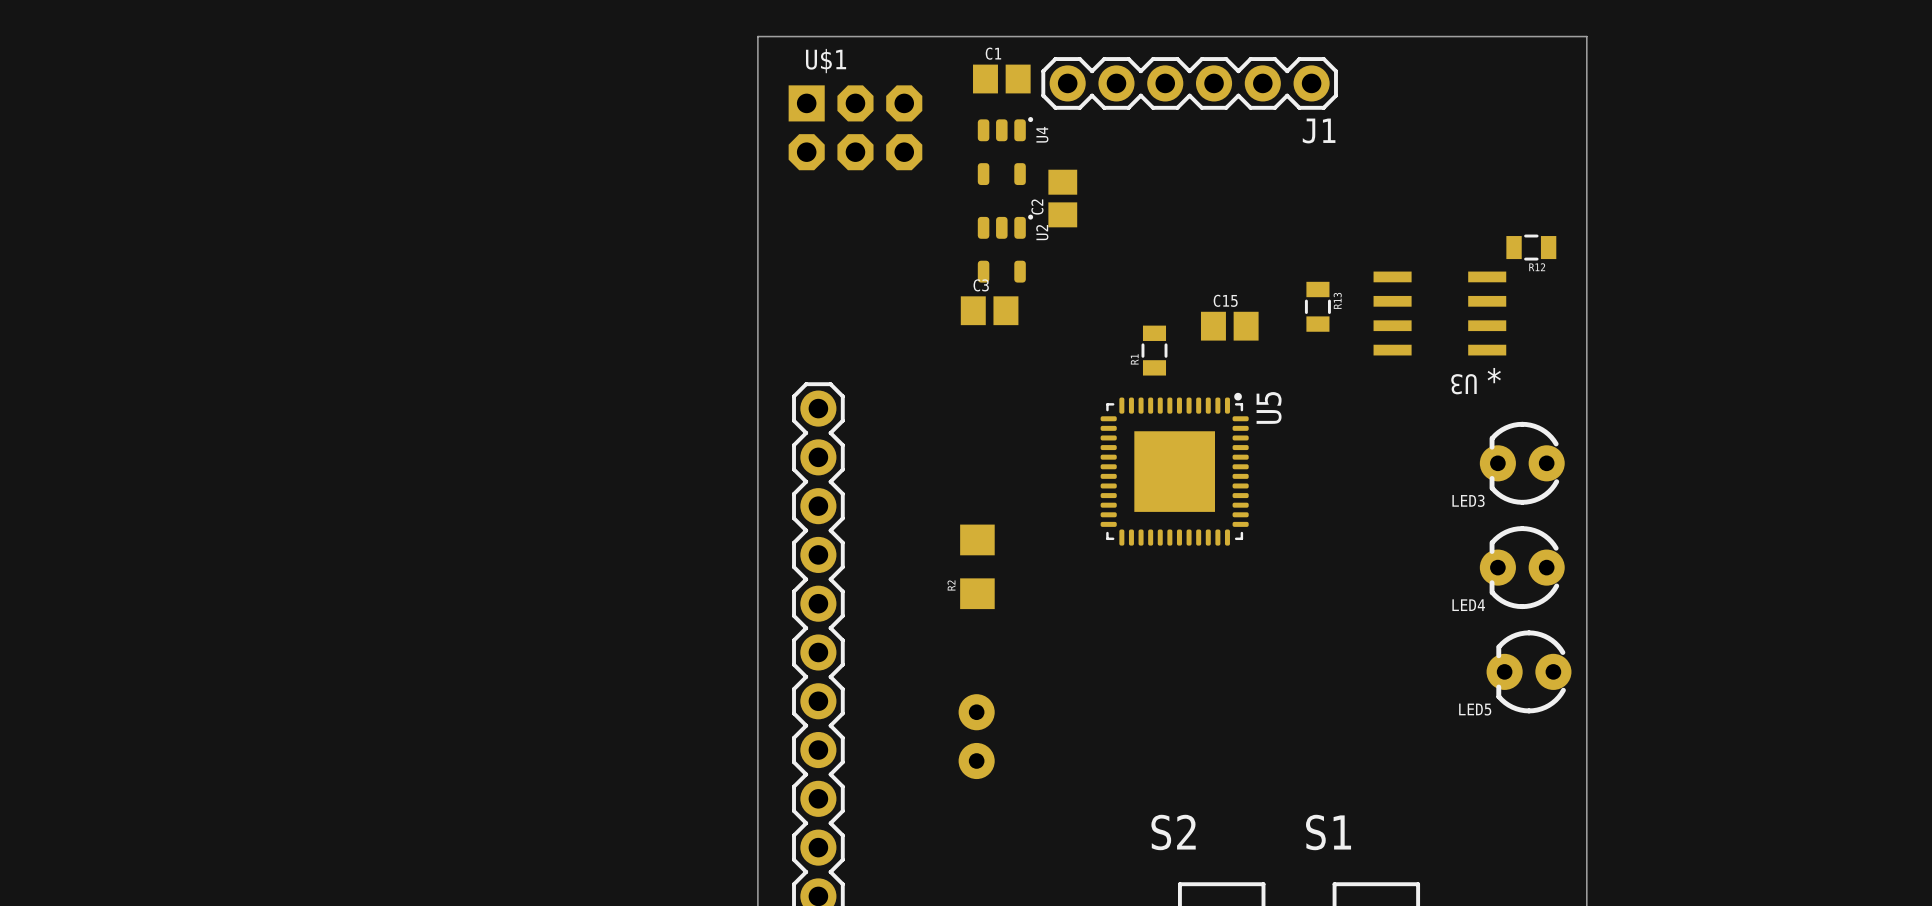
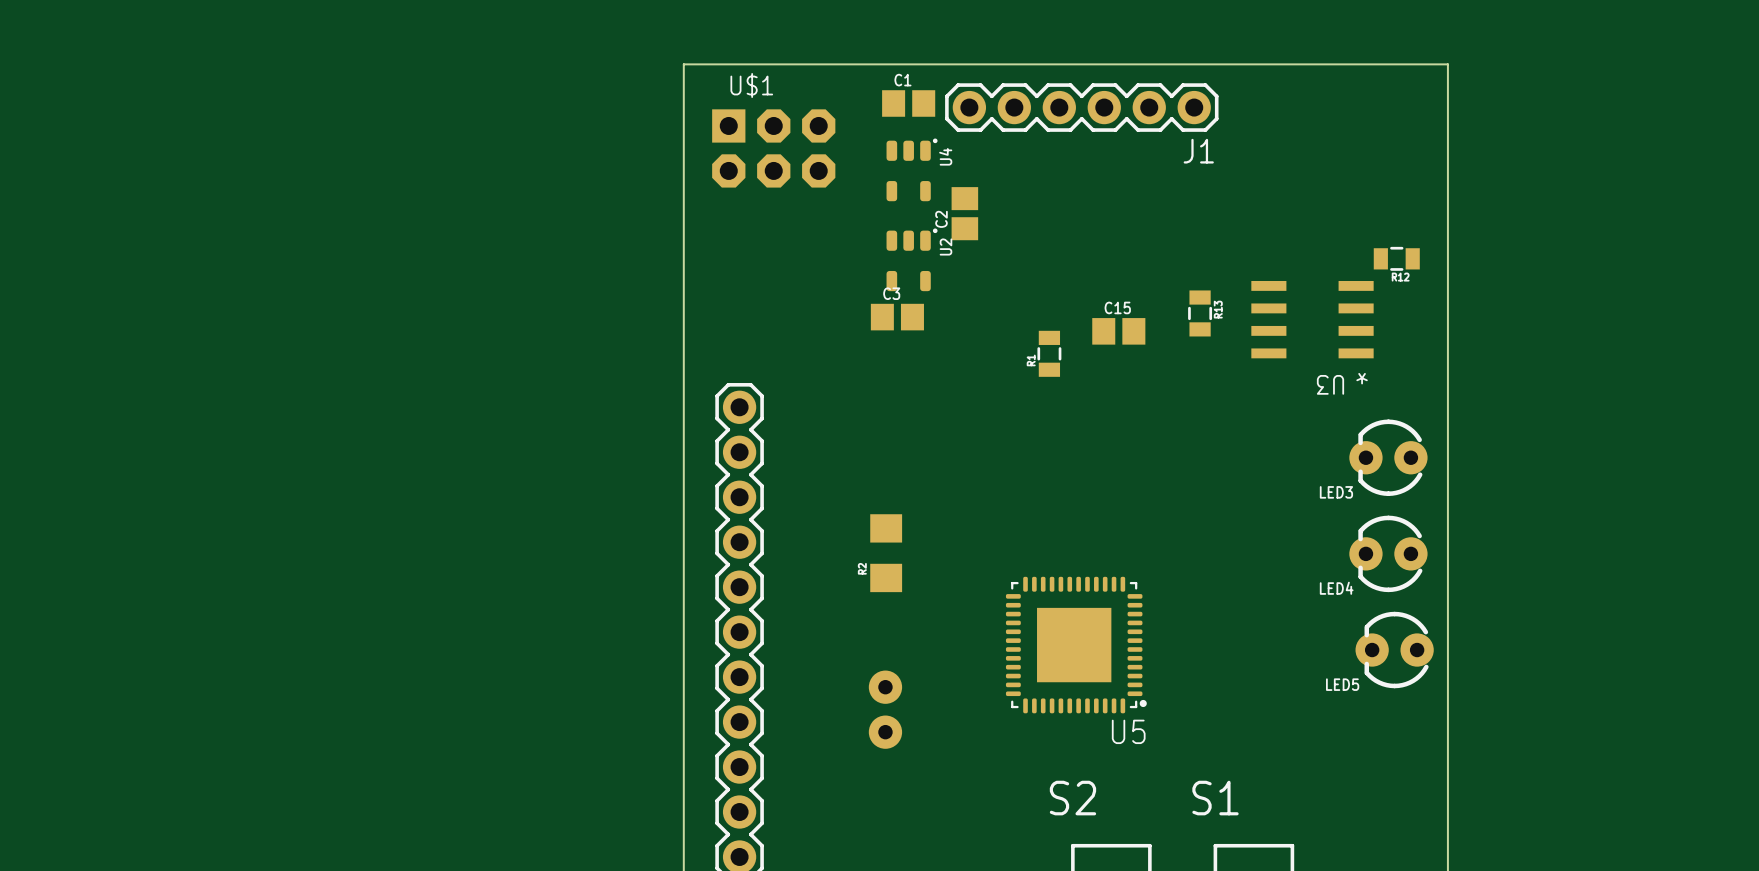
U5 rotation: 0° (1174, 469) -> 90° clockwise (1076, 645)
U5 position: (1174, 469) -> (1076, 645)

